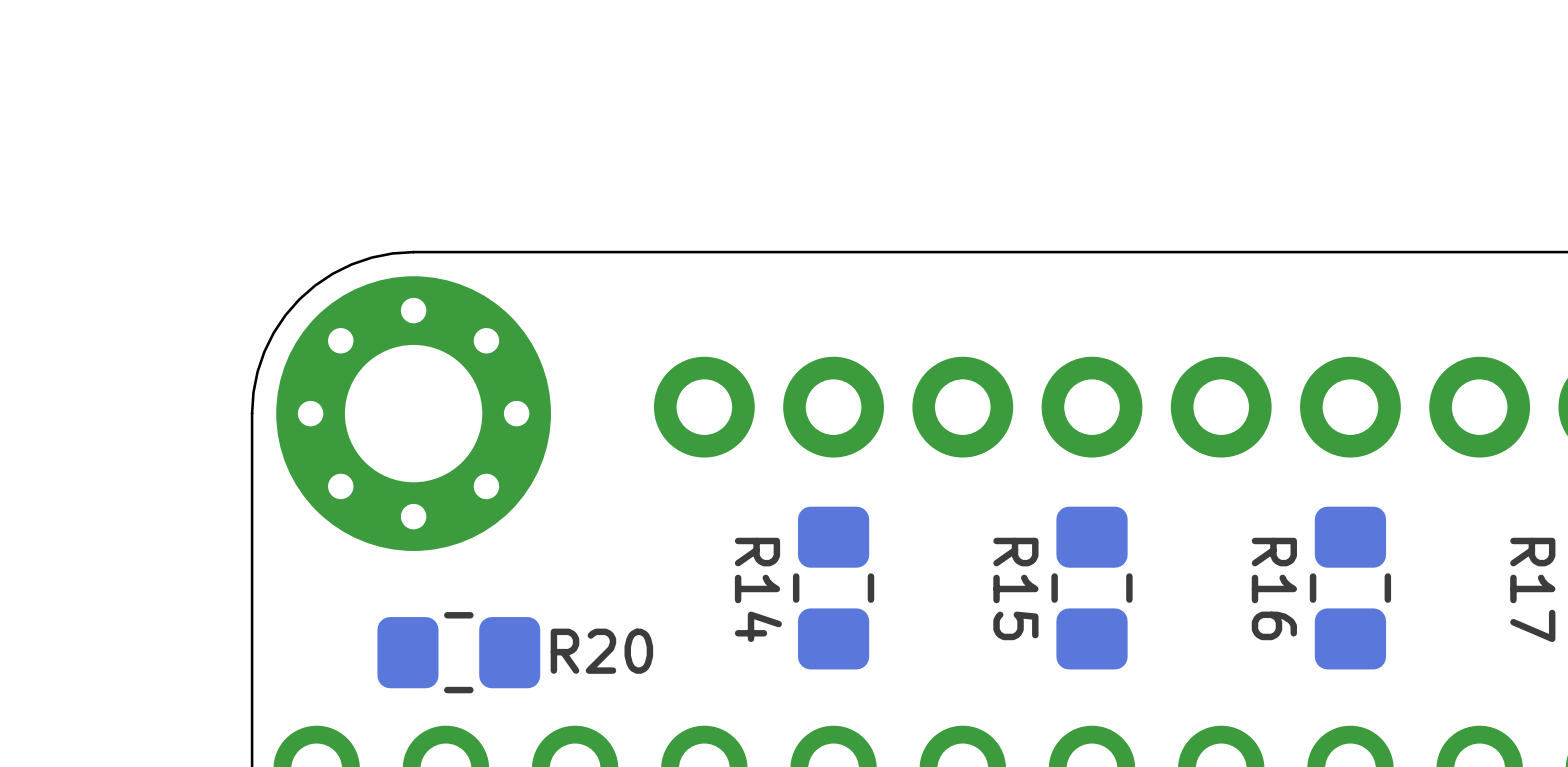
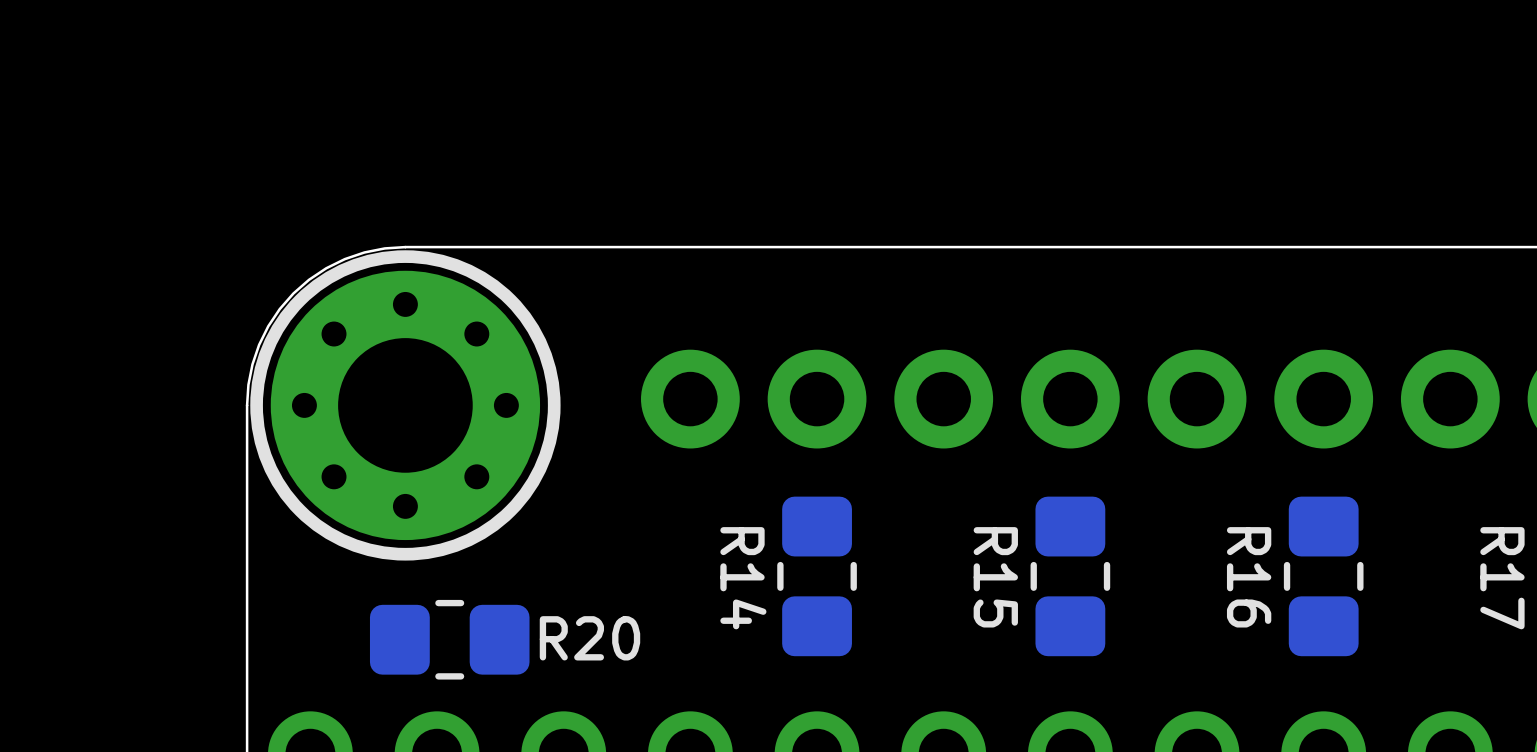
drawing: none -> [250, 250, 561, 561]

